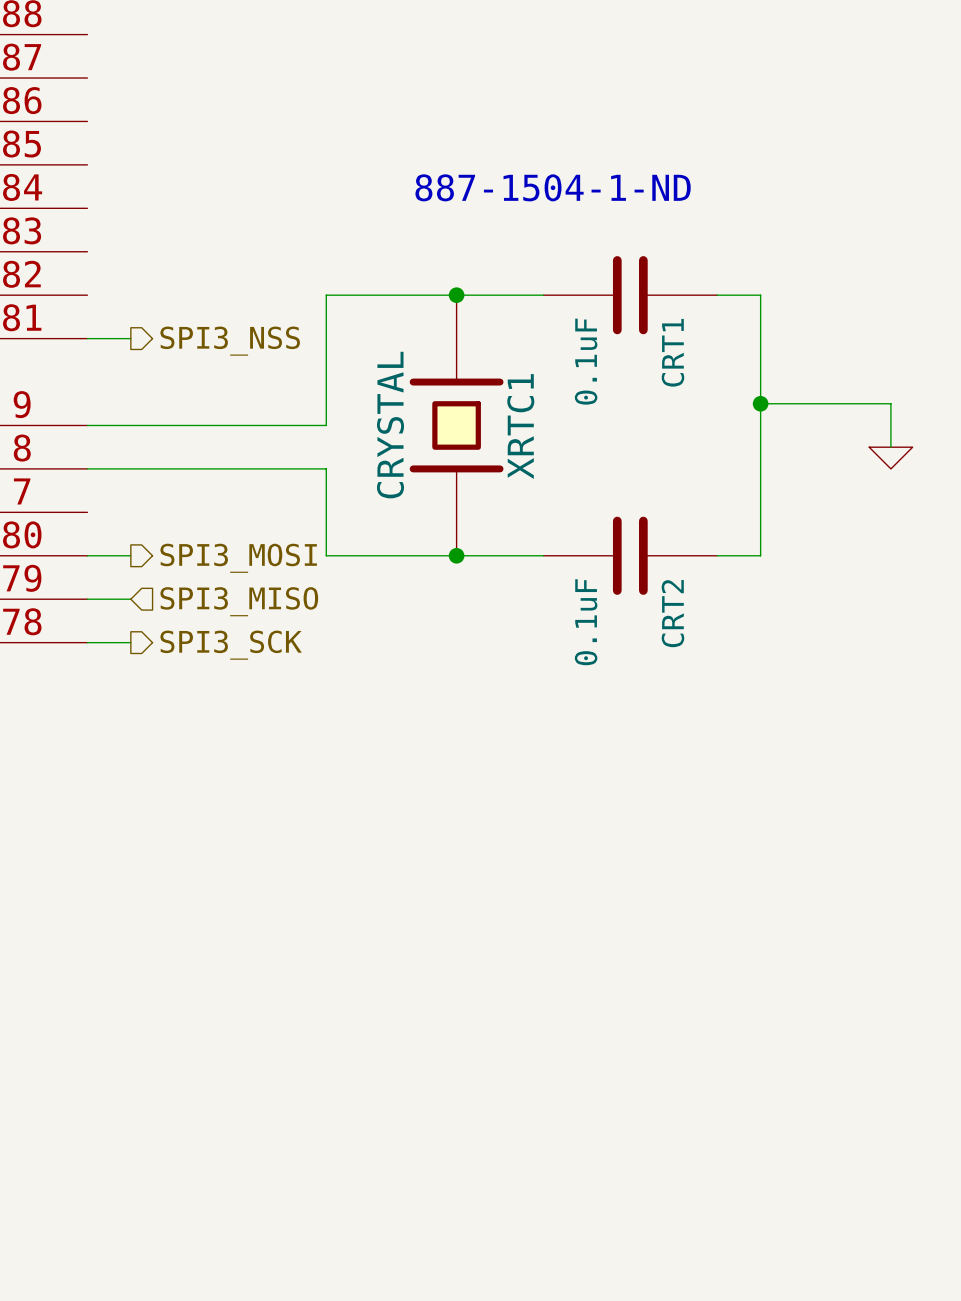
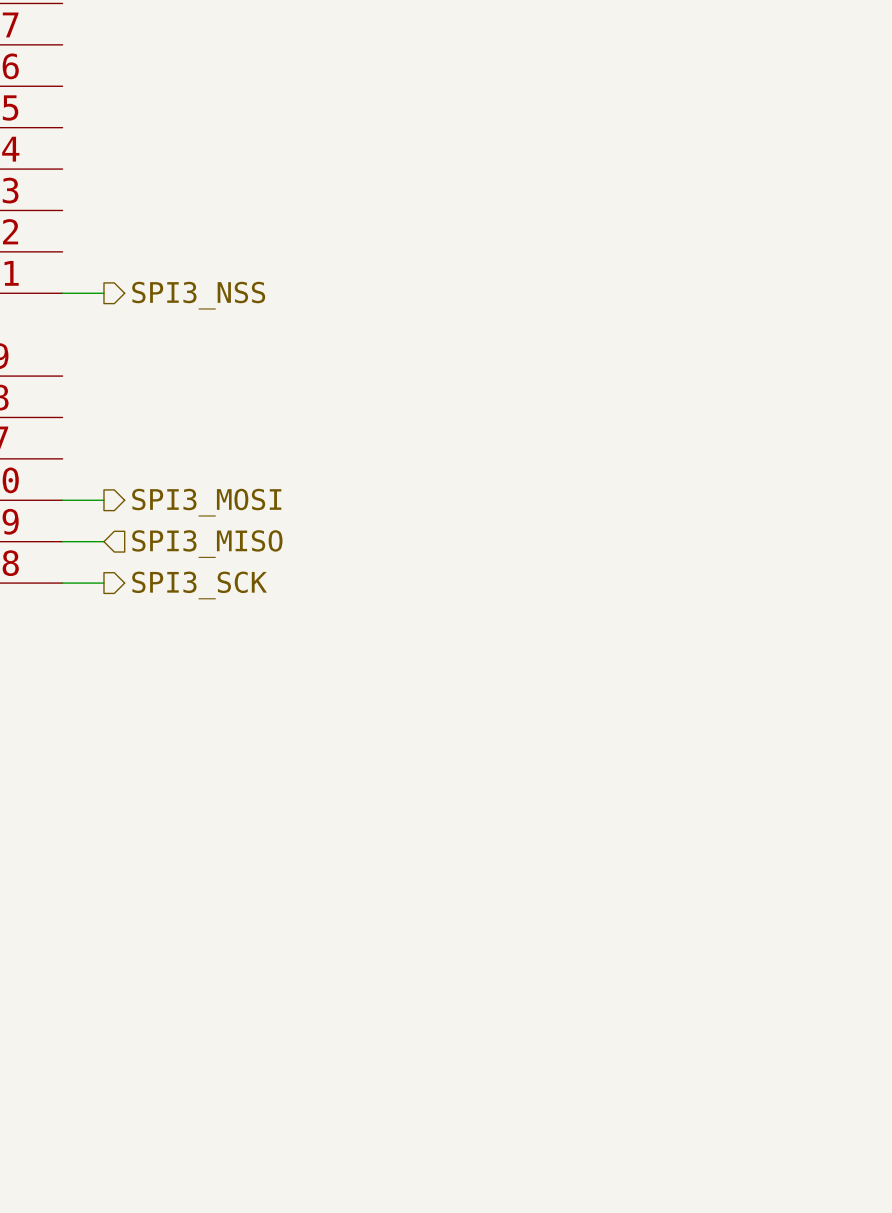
text: 887-1504-1-ND (553, 187) -> none
junction: (456, 295) -> none
wire: (543, 295) (326, 295) (326, 425) (87, 425) -> none
CRT1: 0.1uF (630, 295) -> none
wire: (717, 295) (760, 295) (760, 555) (717, 555) -> none
wire: (760, 403) (890, 403) (890, 447) -> none
junction: (760, 403) -> none
XRTC1: CRYSTAL (456, 425) -> none
power symbol: (890, 458) -> none
wire: (87, 468) (326, 468) (326, 555) (543, 555) -> none
junction: (456, 555) -> none
CRT2: 0.1uF (630, 555) -> none

